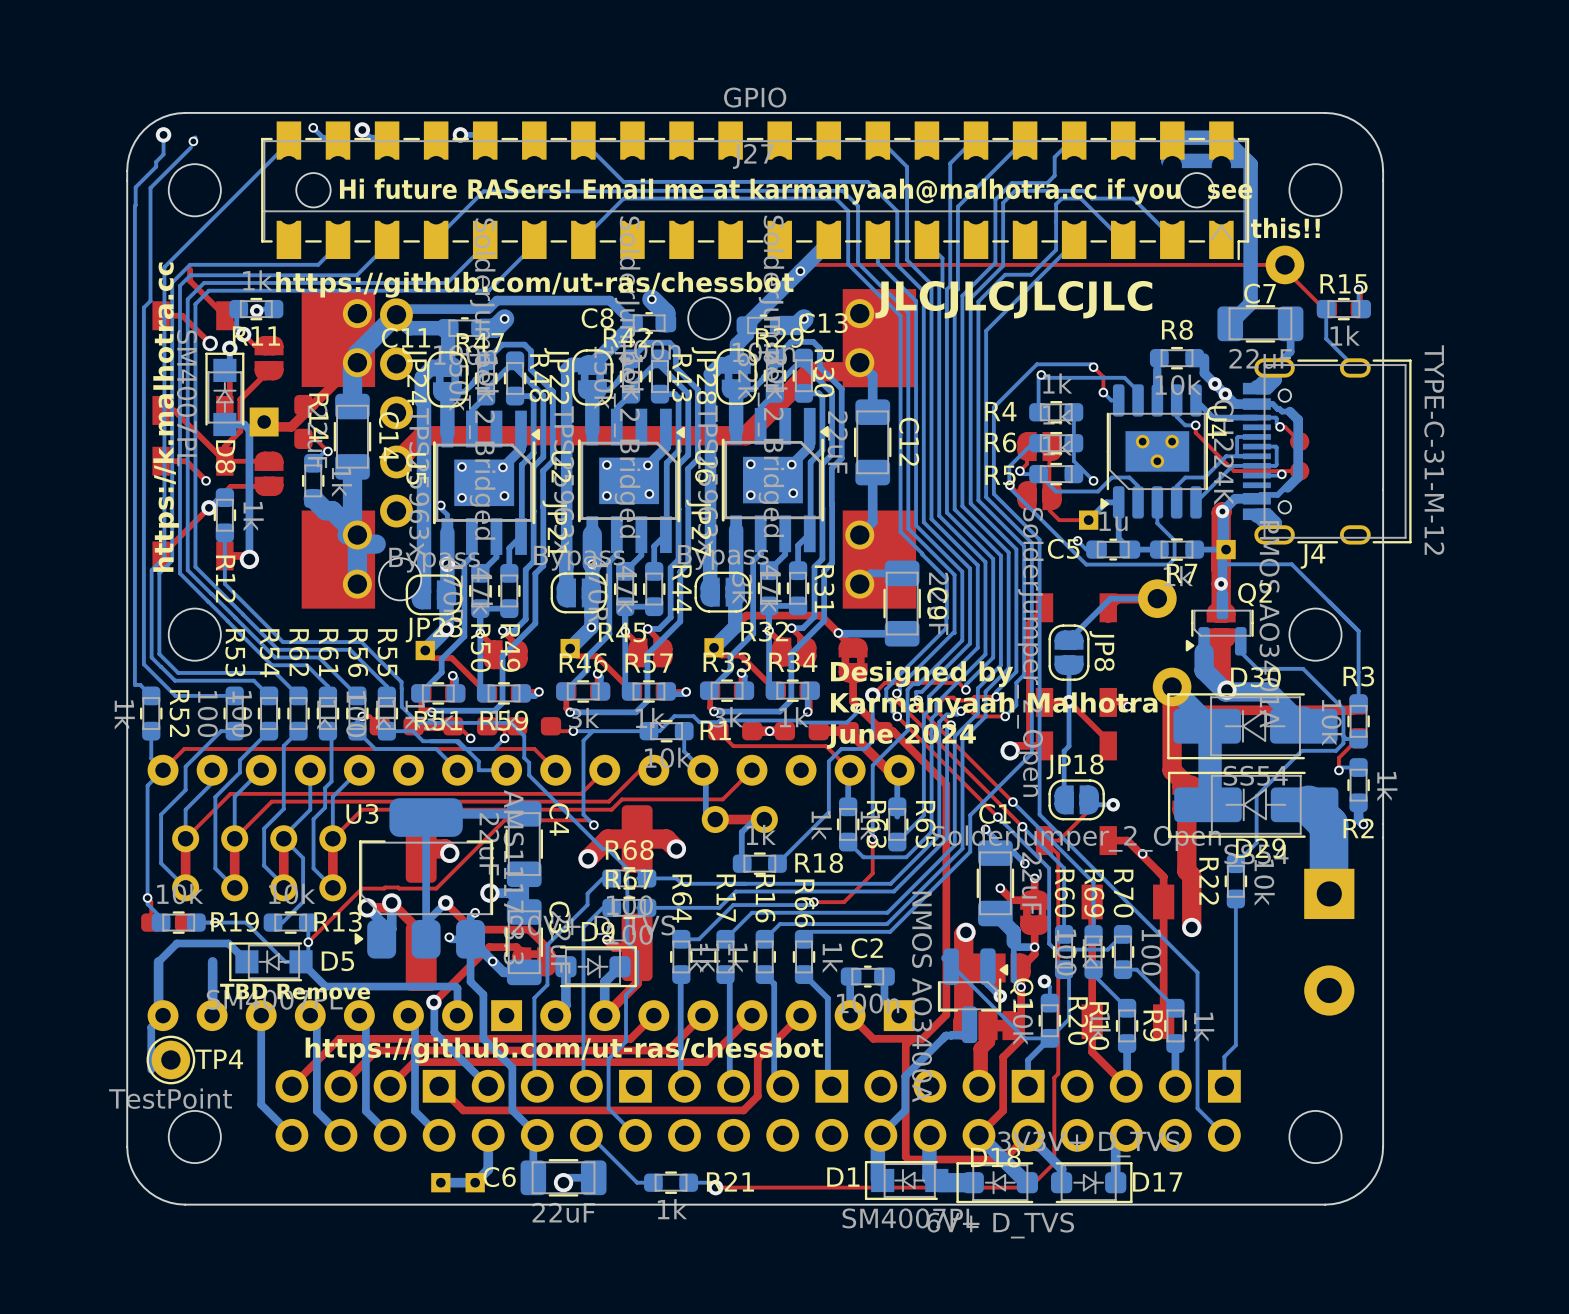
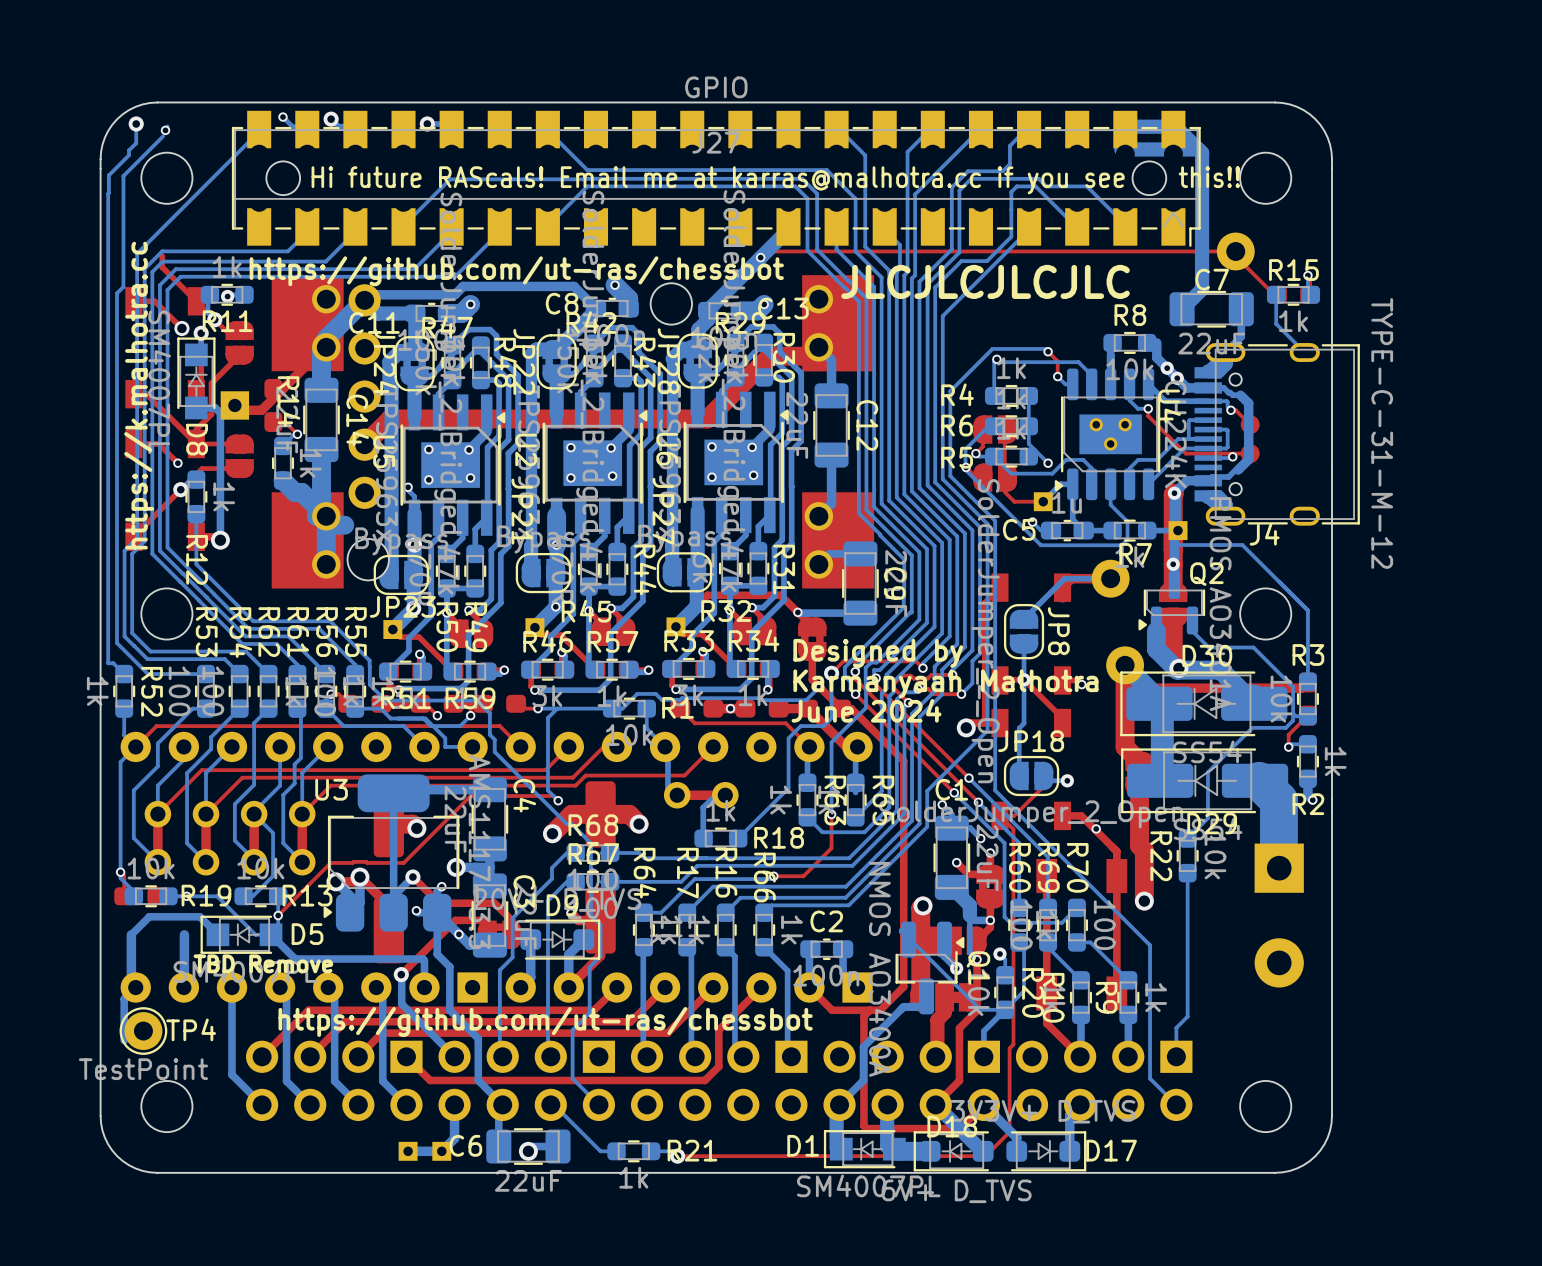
text: Hi future RASers! Email me at karmanyaah@malhotra.cc if you see (796, 191) -> Hi future RAScals! Email me at karras@malhotra.cc if you see this!! (775, 180)
text: this!! (1285, 228) -> none

